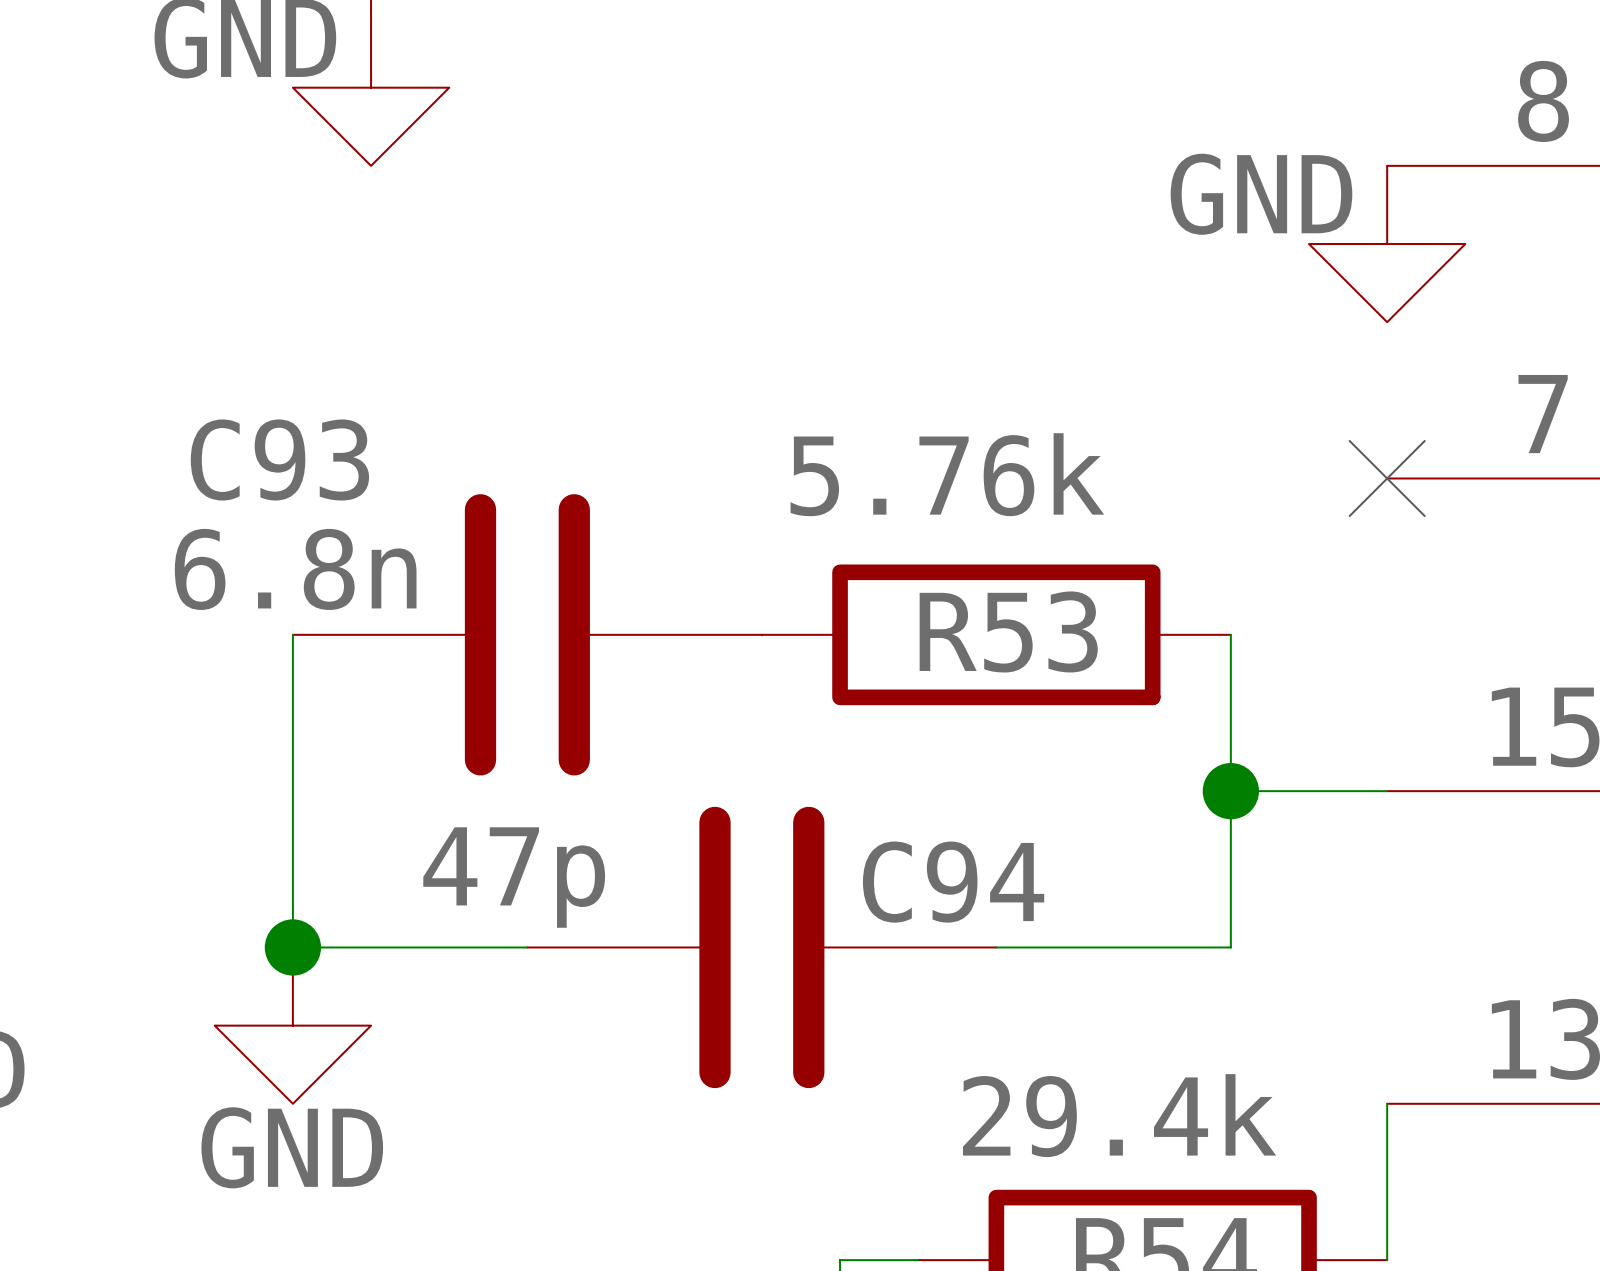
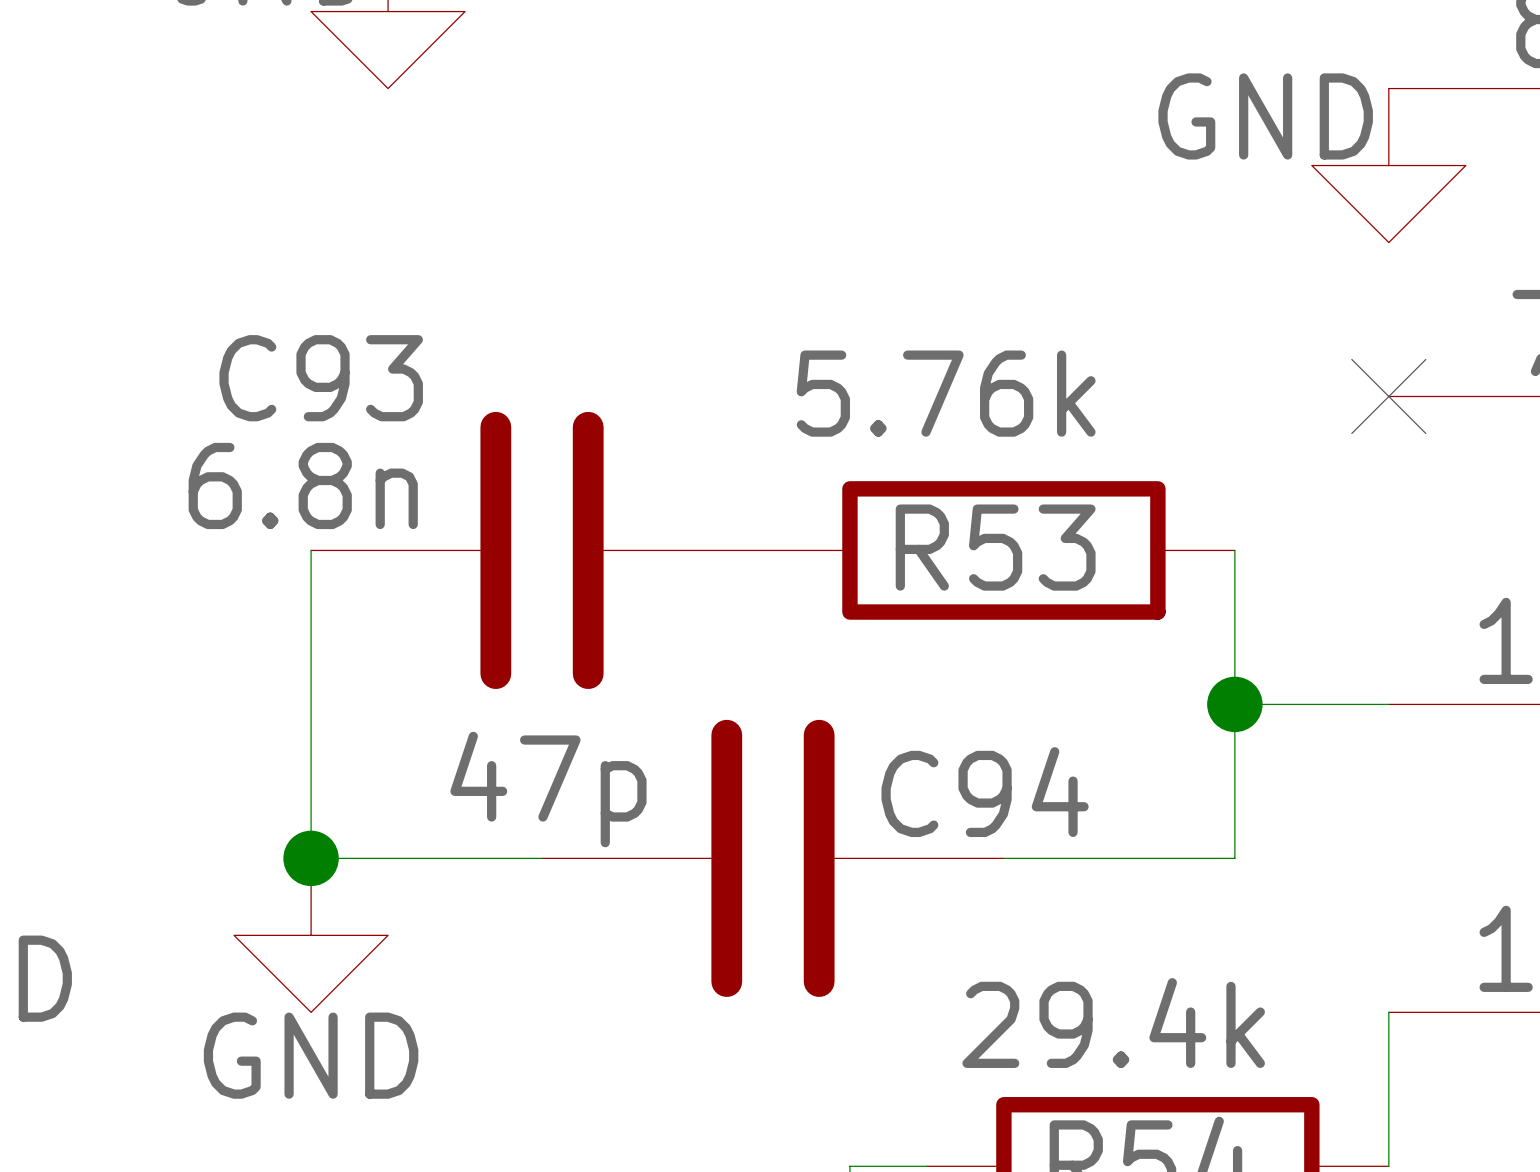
C93 value position: 6.8n (295, 569) -> 6.8n (303, 485)

